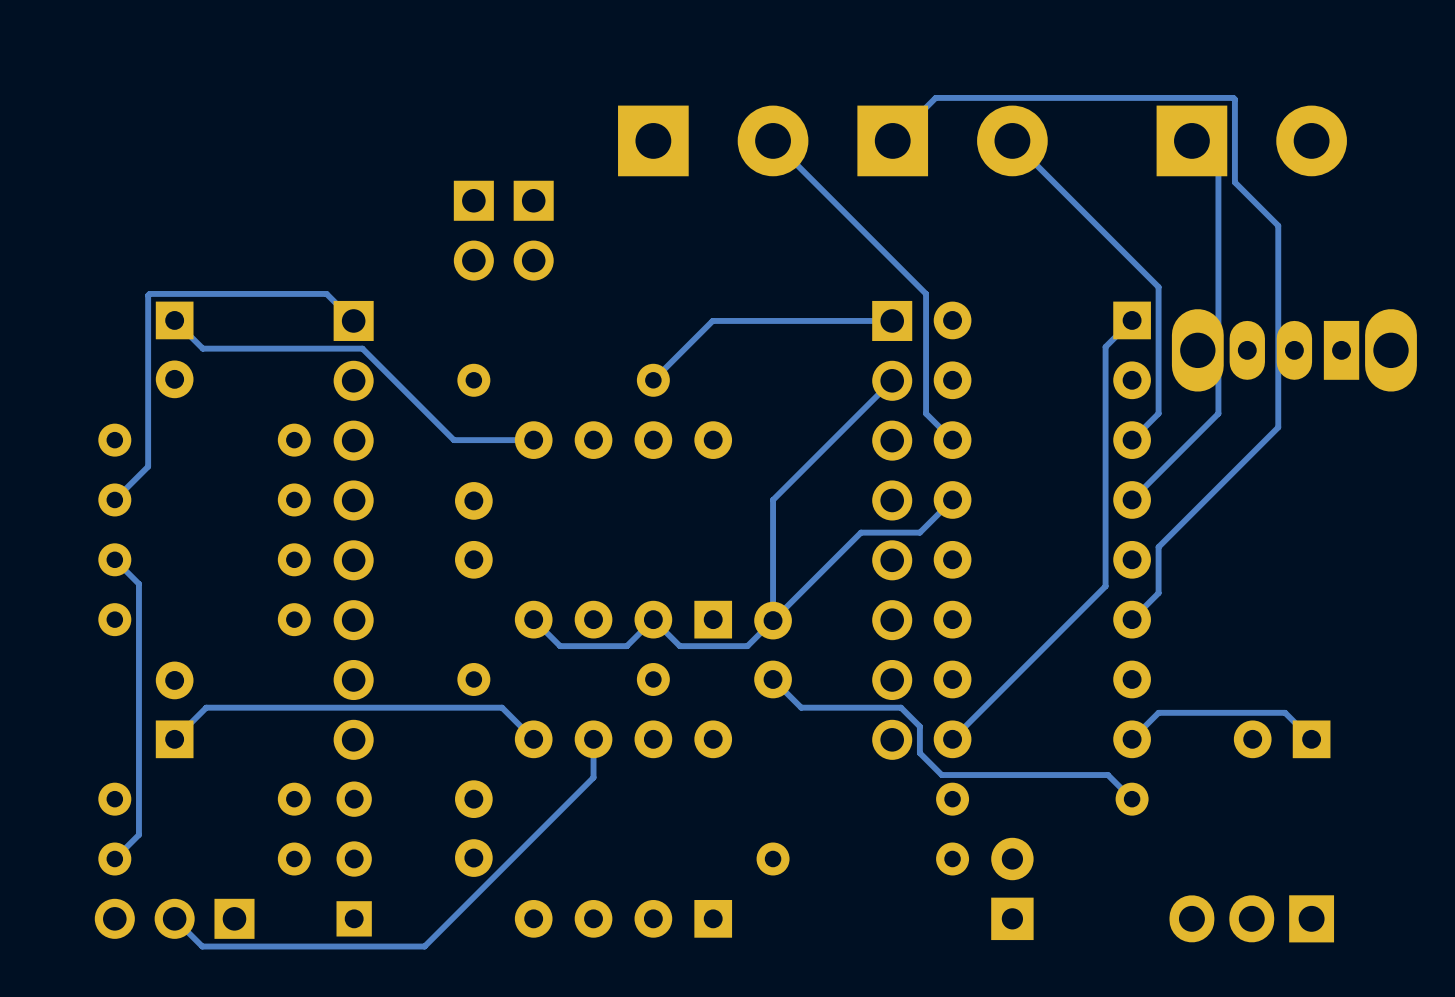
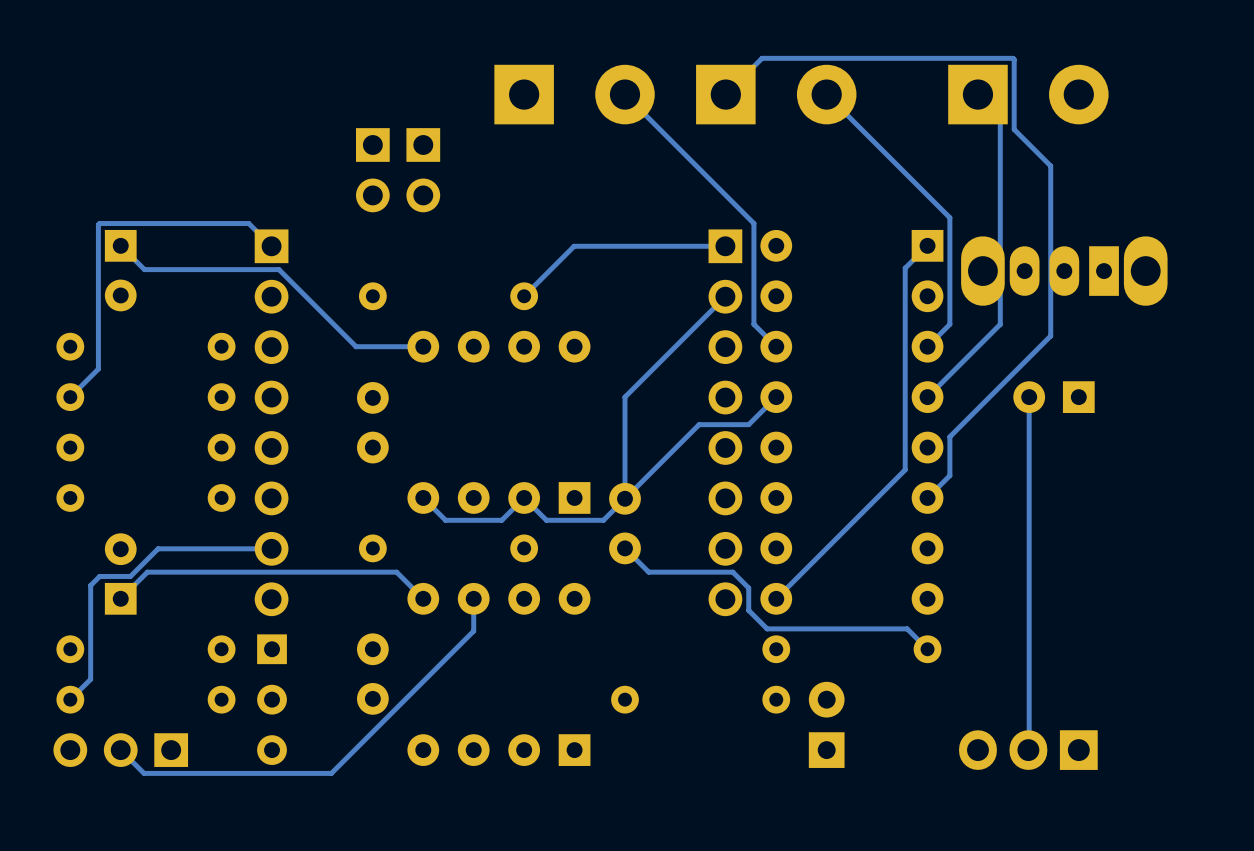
track: none -> (1029, 397) (1028, 750)
track: (114, 559) (138, 583) (138, 723) -> (271, 548) (158, 548) (130, 576) (99, 576) (90, 585)
part position: (1282, 739) -> (1054, 397)
track: (1311, 739) (1285, 712) (1158, 712) (1132, 739) -> none
part rotation: 0° (354, 859) -> 180° (272, 699)

